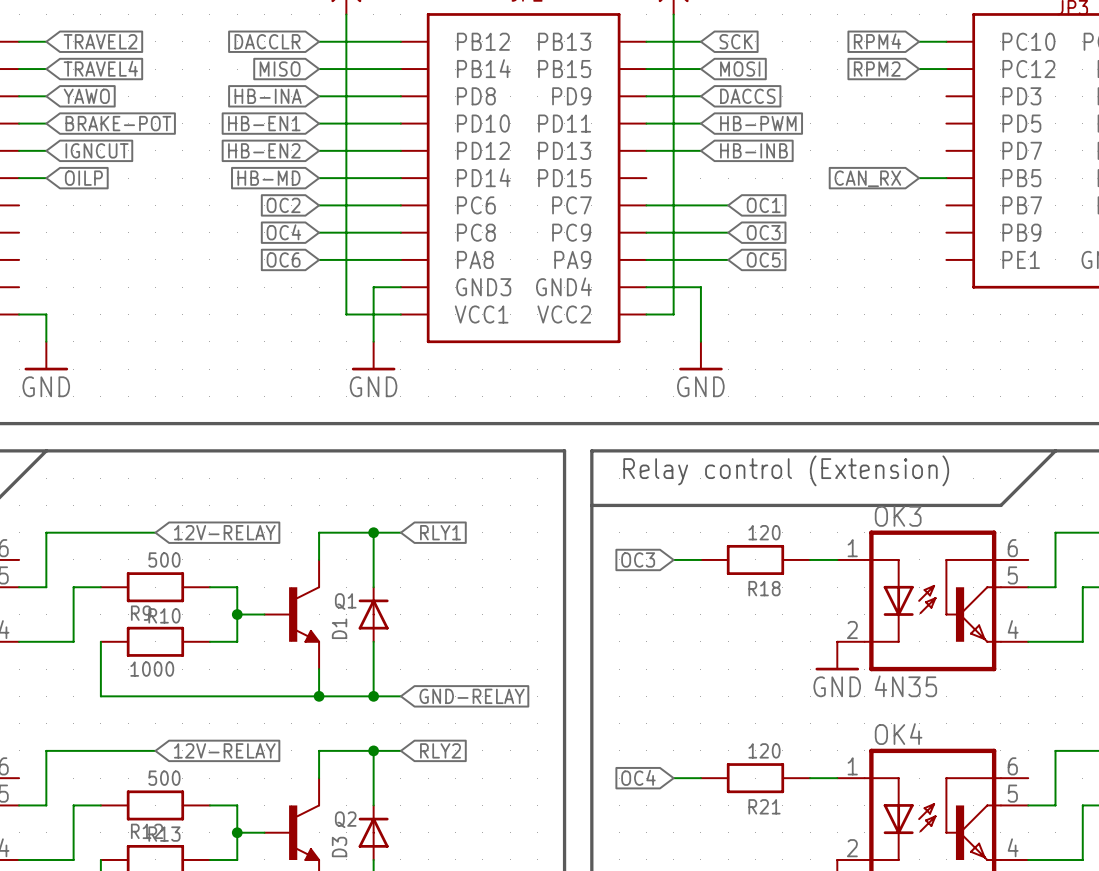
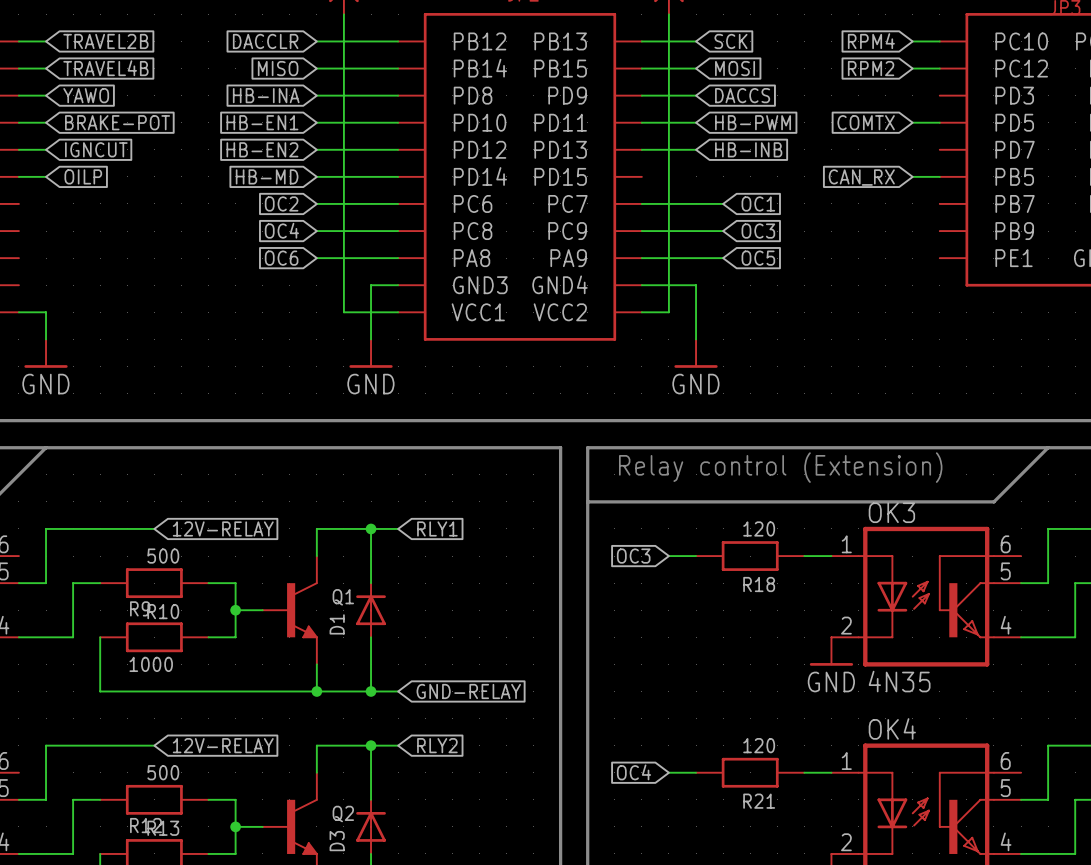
global label: TRAVEL2 (100, 41) -> TRAVEL2B (105, 41)
global label: TRAVEL4 (100, 68) -> TRAVEL4B (105, 68)
global label: none -> COMTX (866, 122)
wire: none -> (912, 122) (939, 122)

